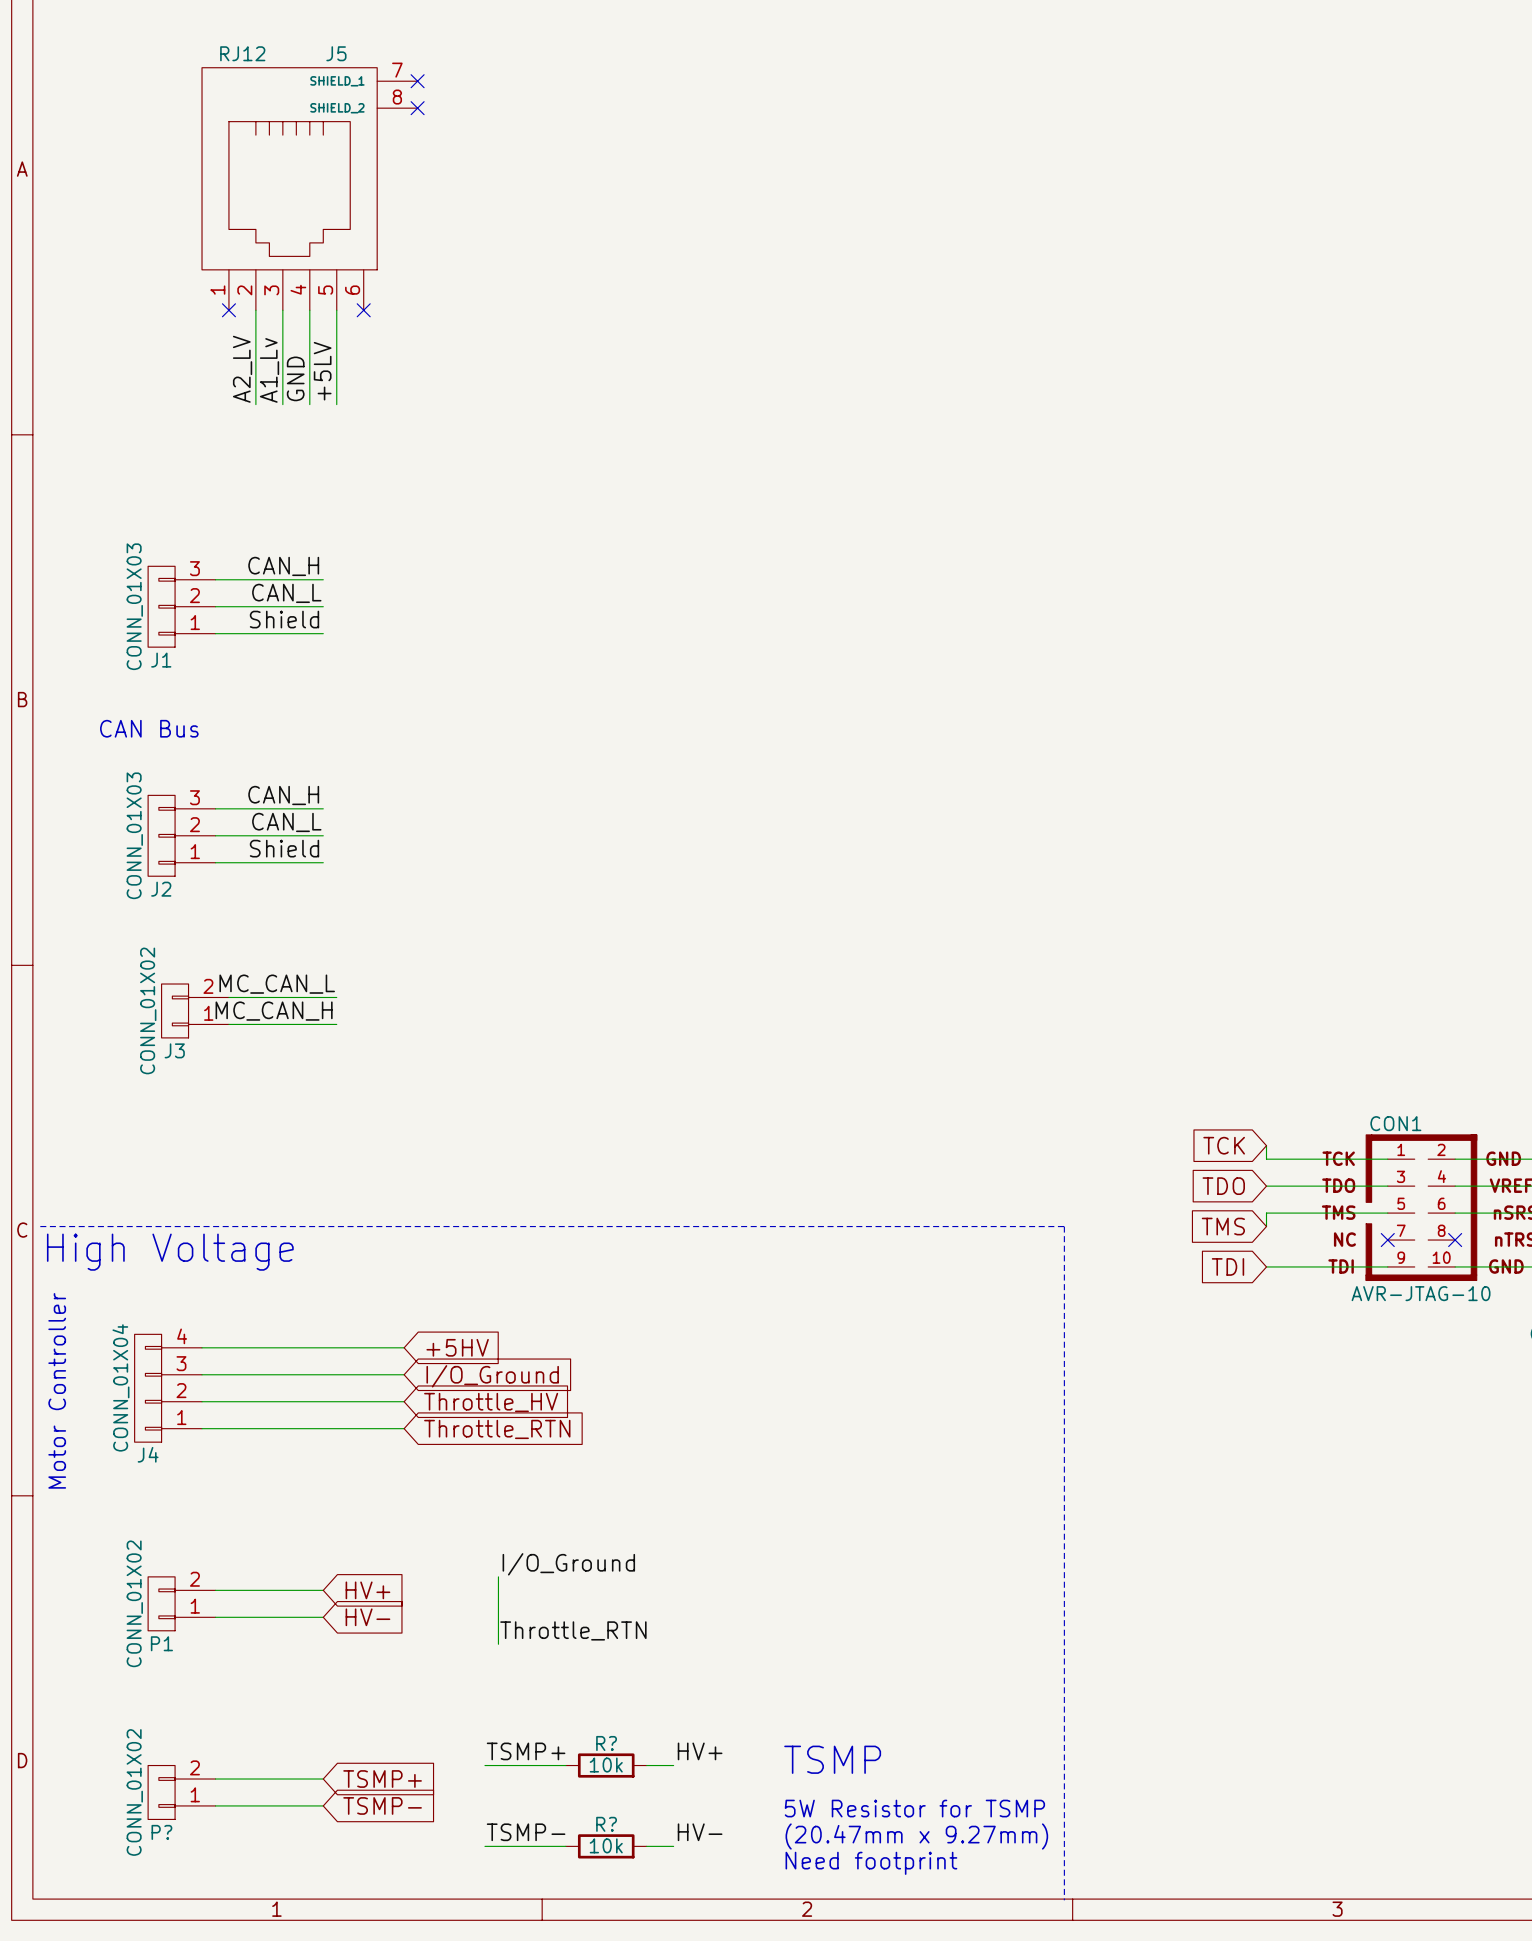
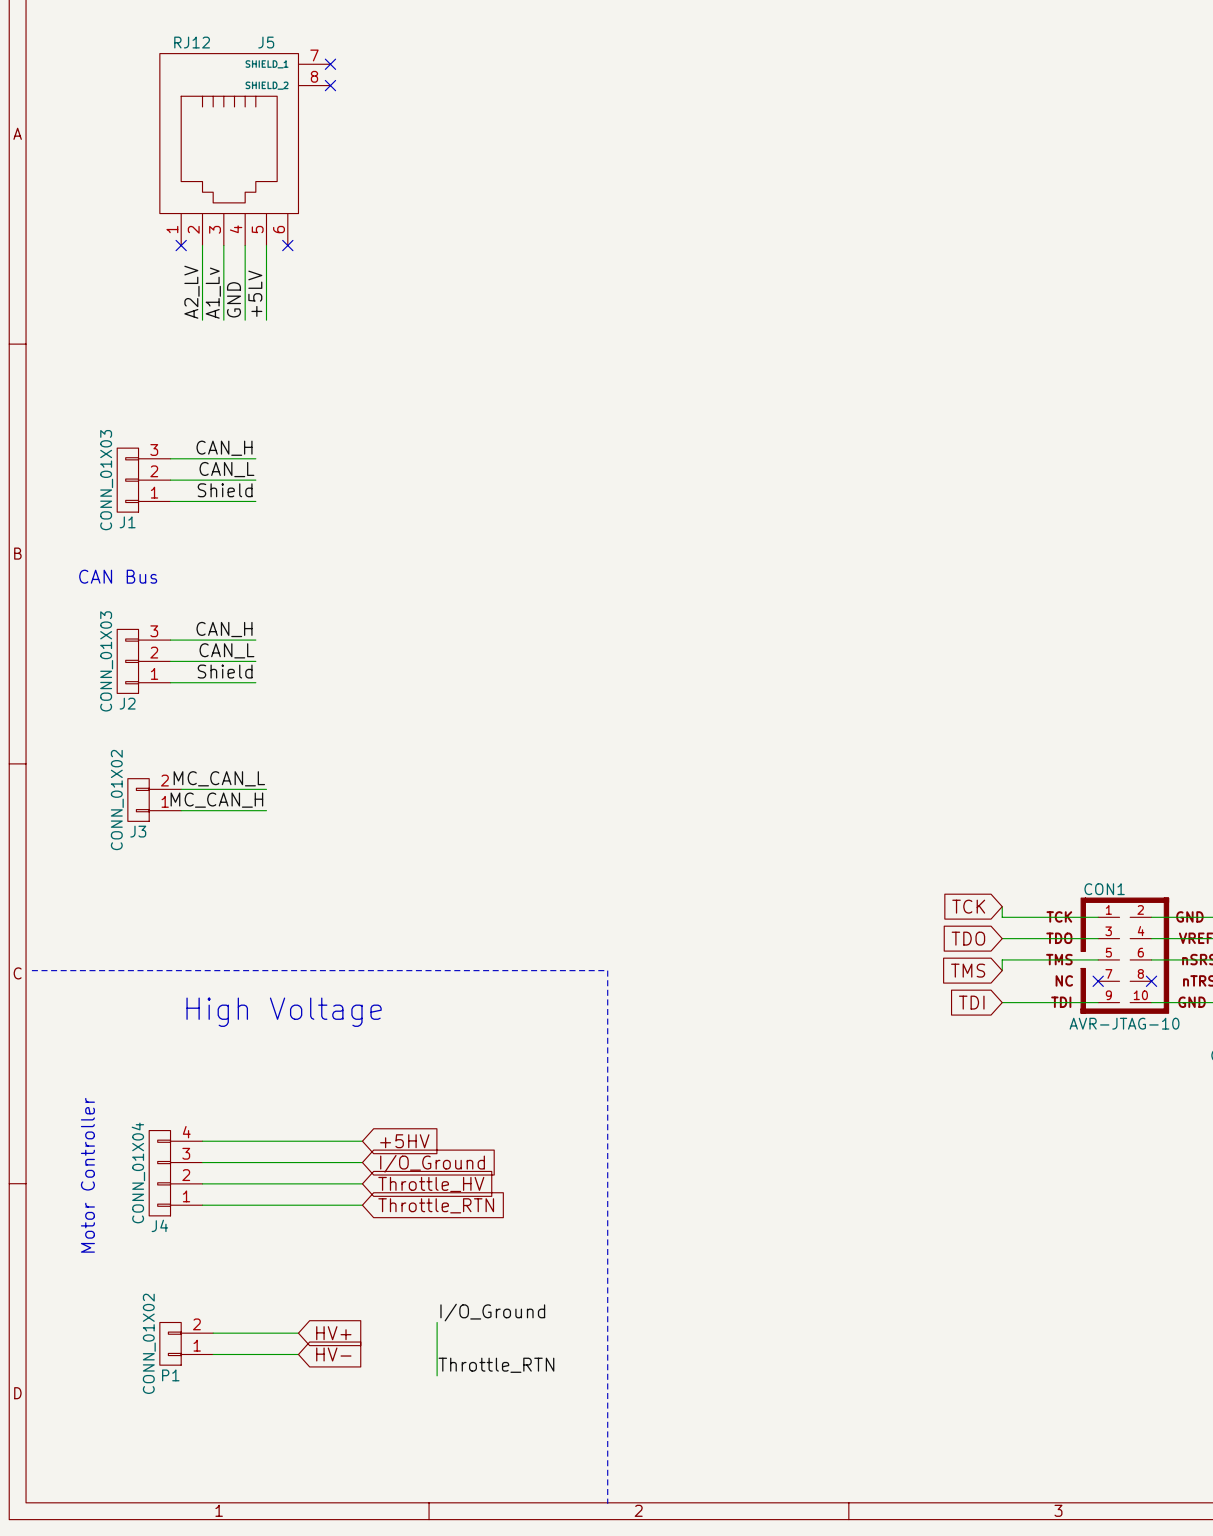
line: (767, 1226) (1064, 1226) (1064, 1900) -> (607, 970) (607, 1503)
text position: High Voltage (170, 1252) -> High Voltage (284, 1012)
wire: (202, 1347) (404, 1347) -> (202, 1141) (362, 1141)
global label position: +5HV (457, 1347) -> +5HV (404, 1141)
wire: (202, 1374) (404, 1374) -> (202, 1162) (362, 1162)
global label position: I/O_Ground (492, 1376) -> I/O_Ground (432, 1163)
J4 position: (168, 1388) -> (175, 1173)
text position: Motor Controller (57, 1390) -> Motor Controller (87, 1175)
wire: (202, 1401) (404, 1401) -> (202, 1183) (362, 1183)
global label position: Throttle_HV (491, 1402) -> Throttle_HV (431, 1184)
wire: (202, 1428) (404, 1428) -> (202, 1205) (362, 1205)
global label position: Throttle_RTN (497, 1429) -> Throttle_RTN (436, 1205)
label position: I/O_Ground (568, 1564) -> I/O_Ground (492, 1312)
wire: (498, 1576) (498, 1644) -> (437, 1322) (437, 1375)
wire: (215, 1590) (323, 1590) -> (213, 1333) (298, 1333)
global label position: HV+ (367, 1590) -> HV+ (333, 1333)
P1 position: (181, 1603) -> (186, 1343)
wire: (215, 1617) (323, 1617) -> (213, 1354) (298, 1354)
global label position: HV- (367, 1617) -> HV- (333, 1354)
label position: Throttle_RTN (573, 1630) -> Throttle_RTN (496, 1365)
label: TSMP+ (526, 1751) -> none
label: HV+ (700, 1751) -> none
text: TSMP (832, 1759) -> none
wire: (484, 1765) (565, 1765) -> none
R?: 10k (606, 1765) -> none
wire: (646, 1765) (673, 1765) -> none
wire: (215, 1779) (323, 1779) -> none
global label: TSMP+ (382, 1779) -> none
P?: CONN_01X02 (181, 1792) -> none
wire: (215, 1805) (323, 1805) -> none
global label: TSMP- (382, 1805) -> none
text: 5W Resistor for TSMP (914, 1808) -> none
label: TSMP- (526, 1832) -> none
label: HV- (700, 1832) -> none
text: (20.47mm x 9.27mm) (916, 1836) -> none
wire: (484, 1846) (565, 1846) -> none
R?: 10k (606, 1846) -> none
wire: (646, 1846) (673, 1846) -> none
text: Need footprint (871, 1863) -> none

